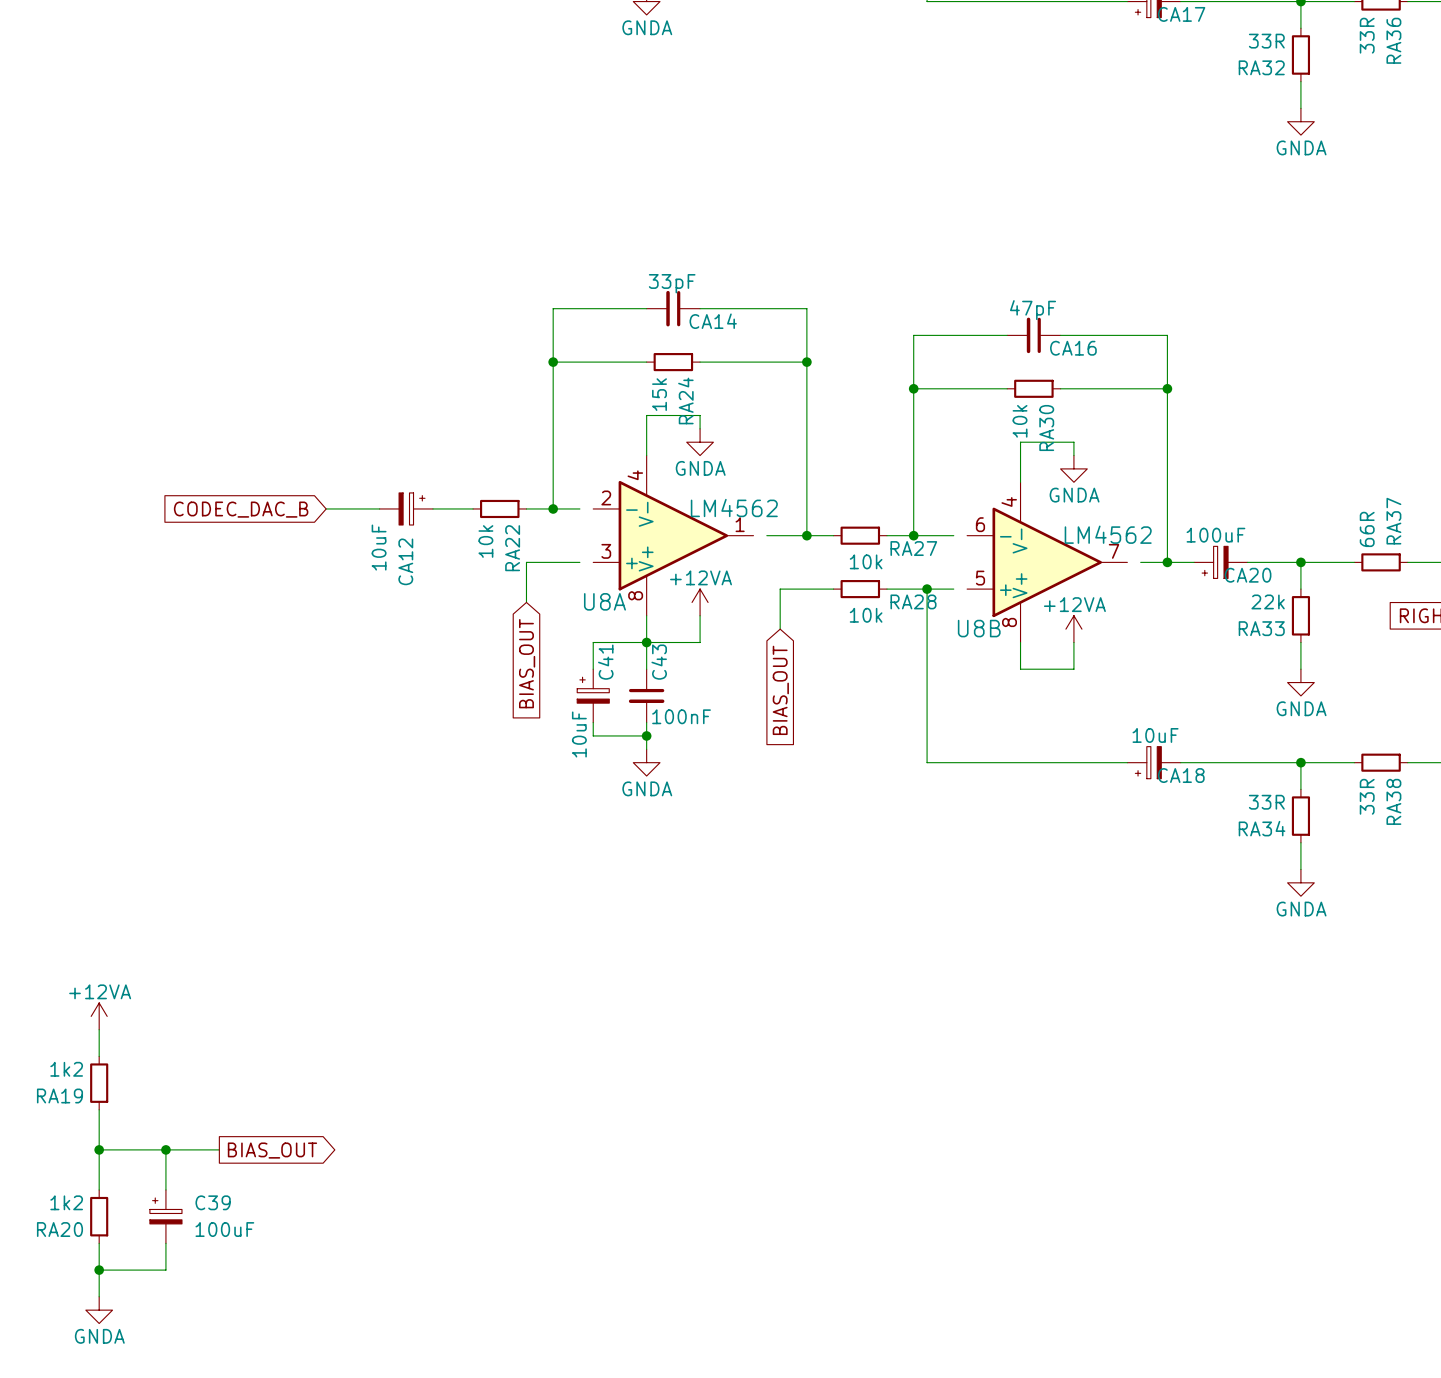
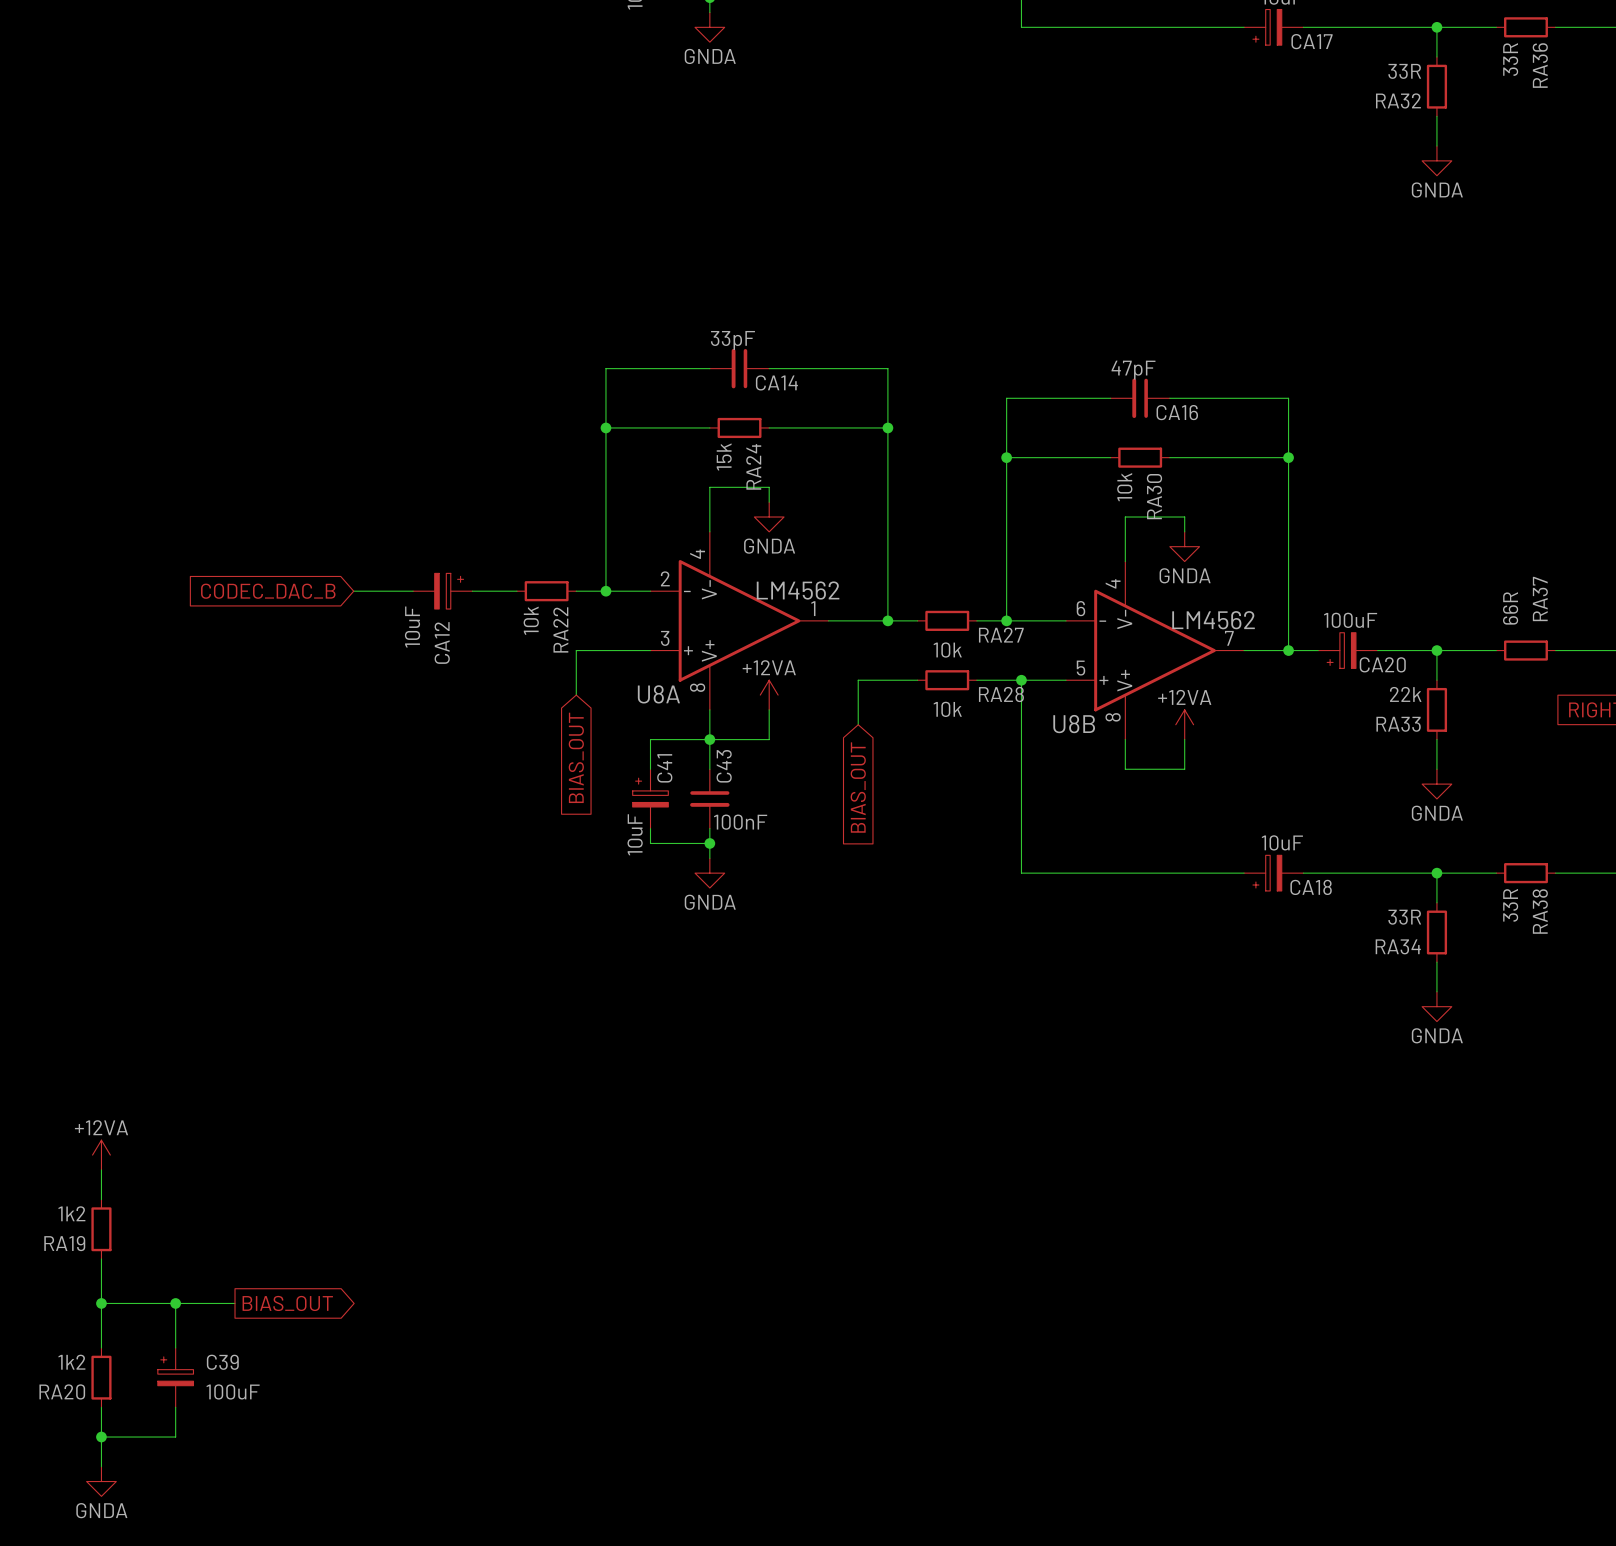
wire: none -> (635, 591) (650, 591)
wire: none -> (828, 620) (843, 620)
wire: none -> (1051, 620) (1065, 620)
wire: none -> (635, 650) (650, 650)
wire: none -> (1244, 650) (1258, 650)
wire: none -> (1051, 680) (1065, 680)

